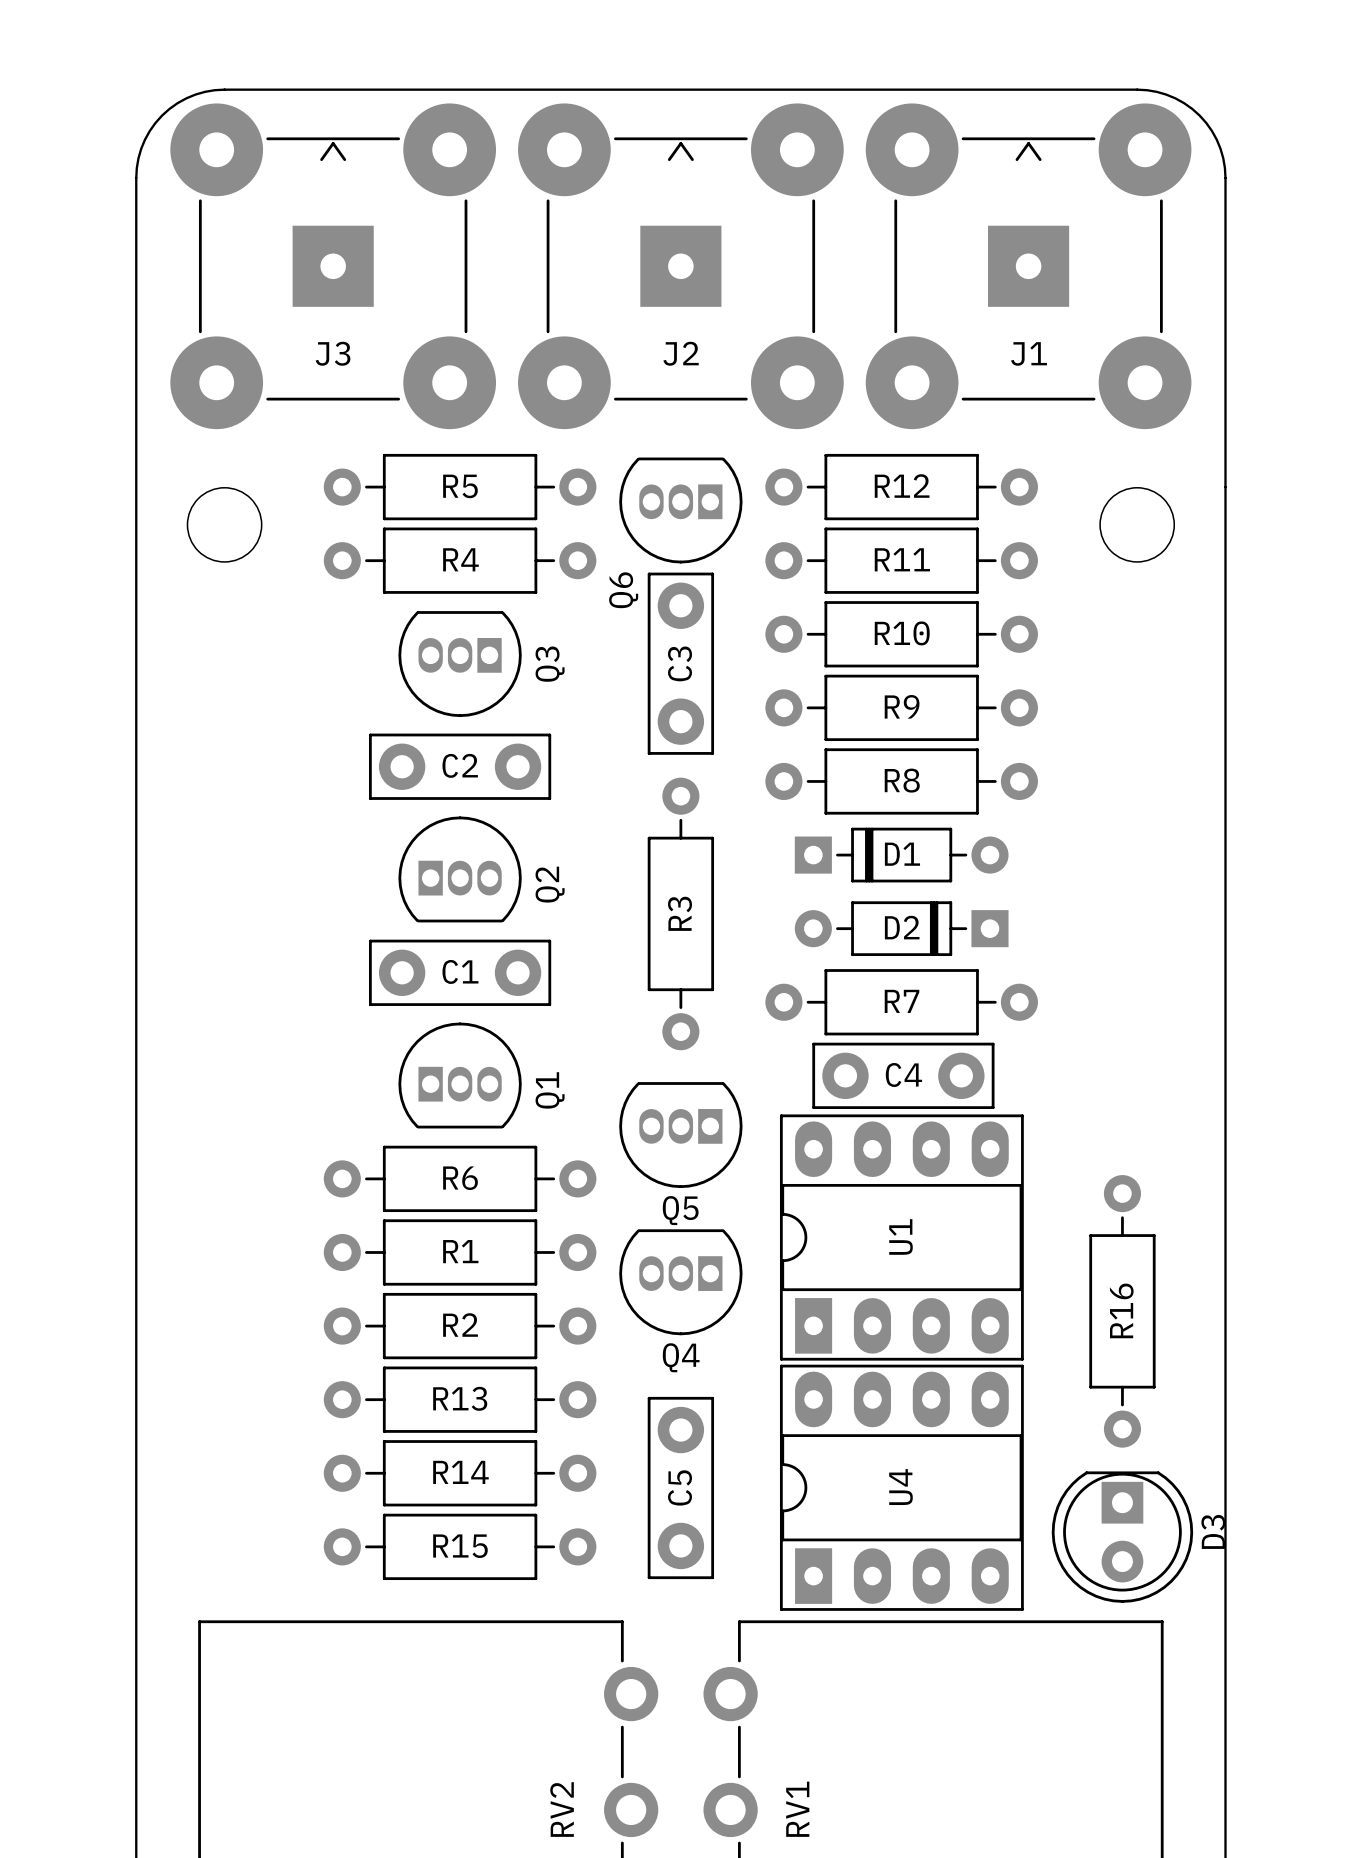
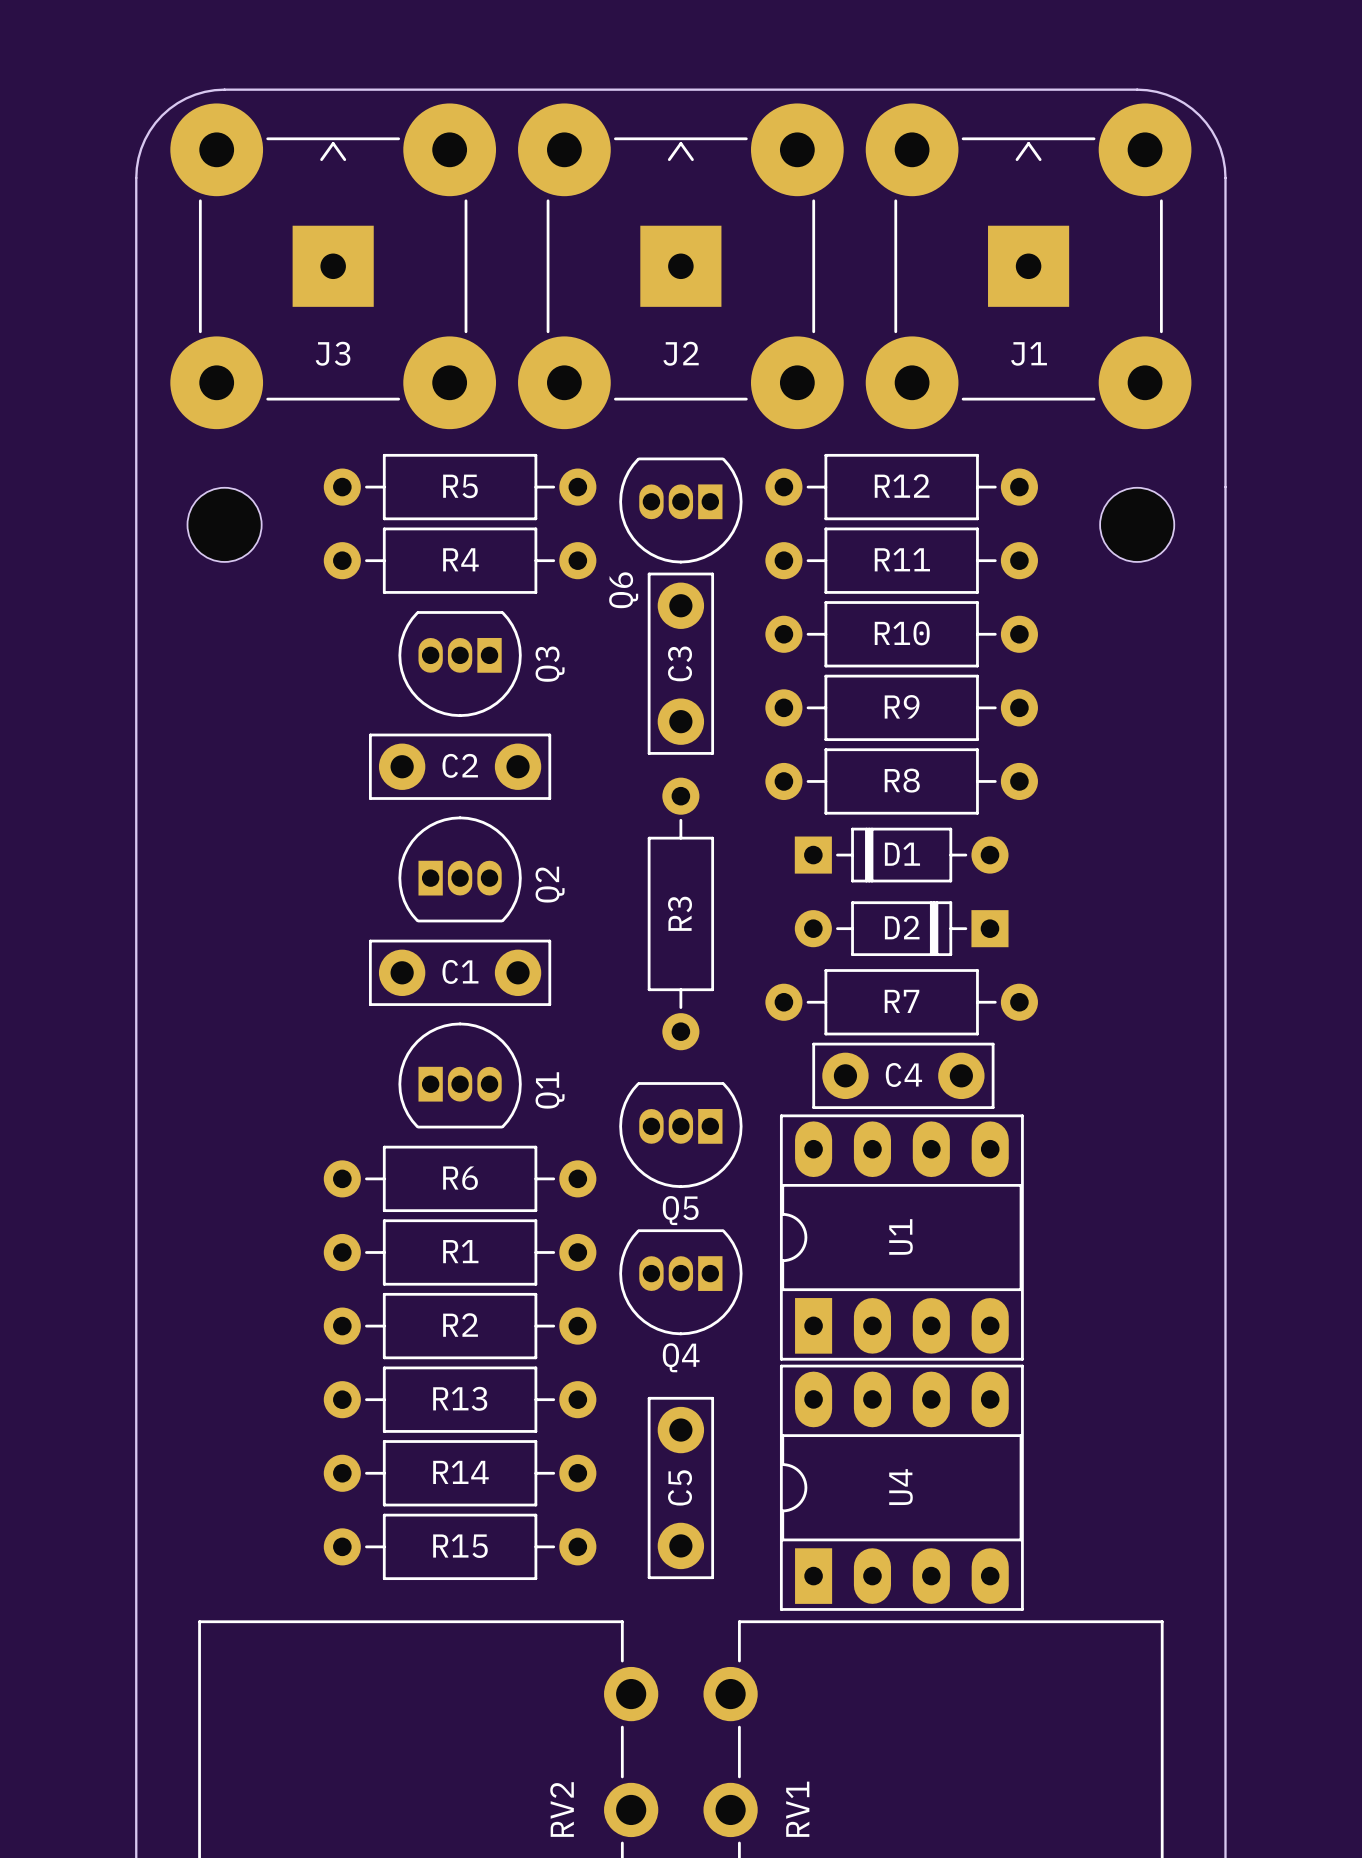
R16: (1122, 1311) -> none
D3: (1122, 1537) -> none

